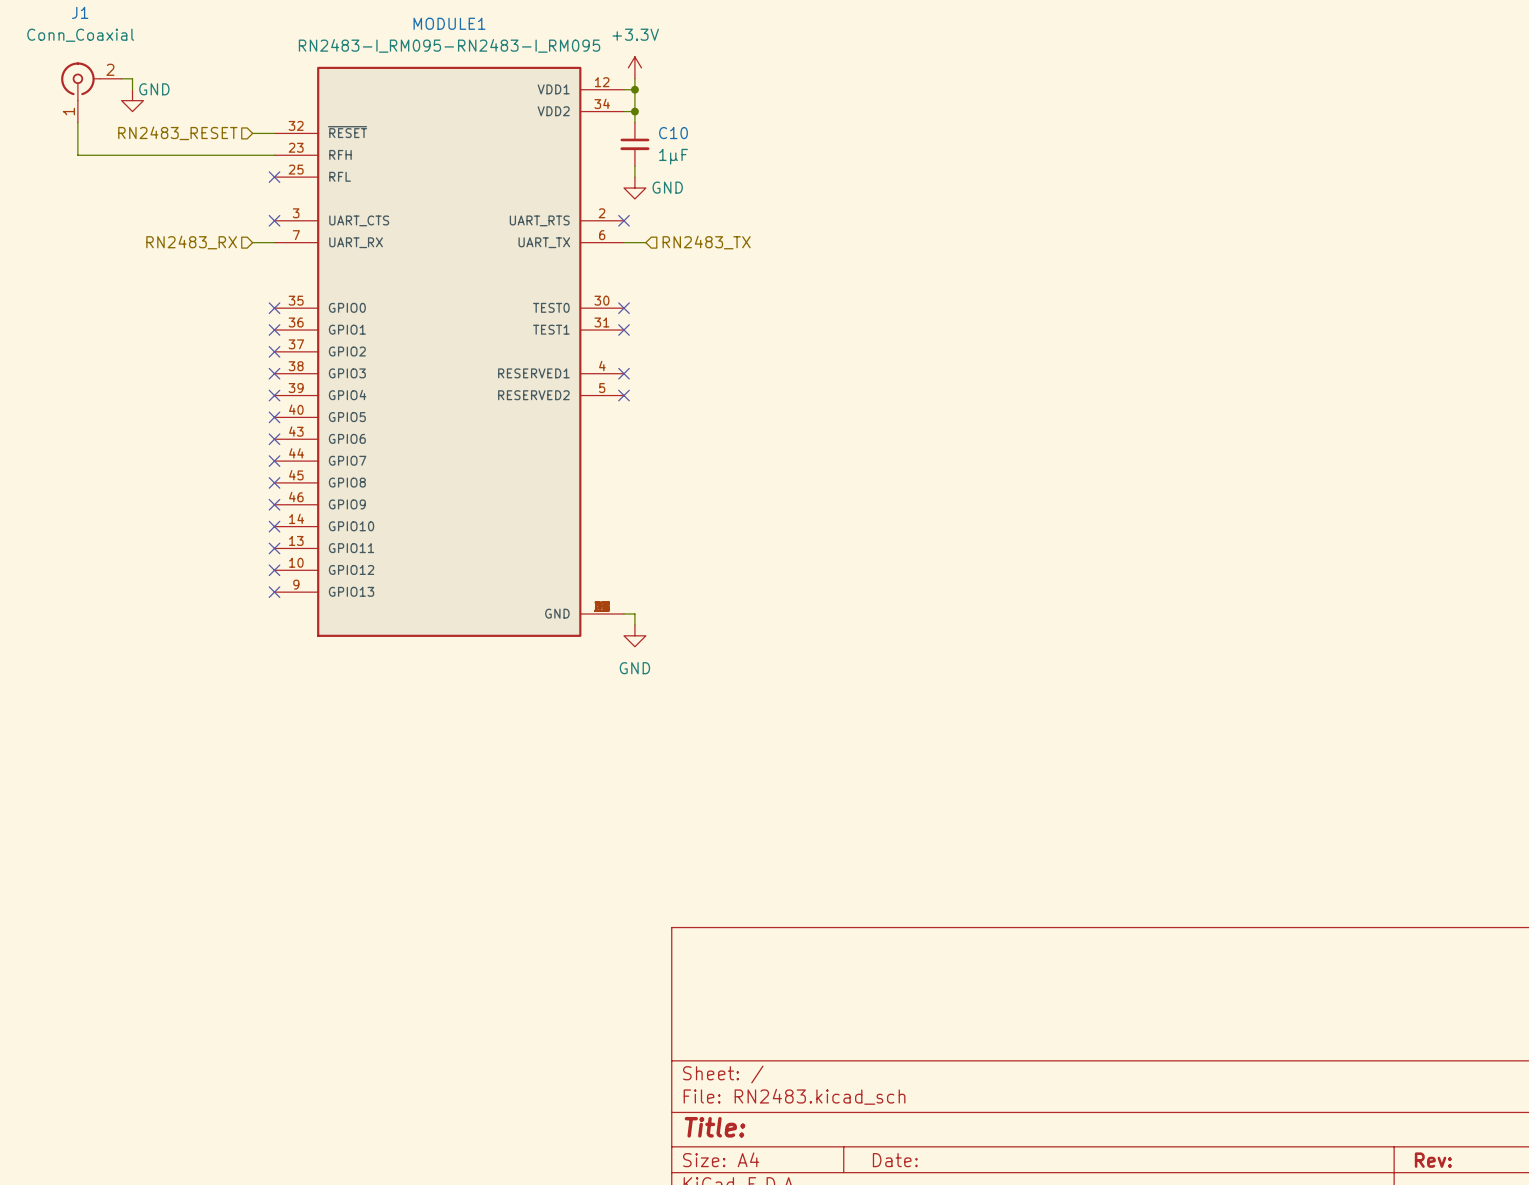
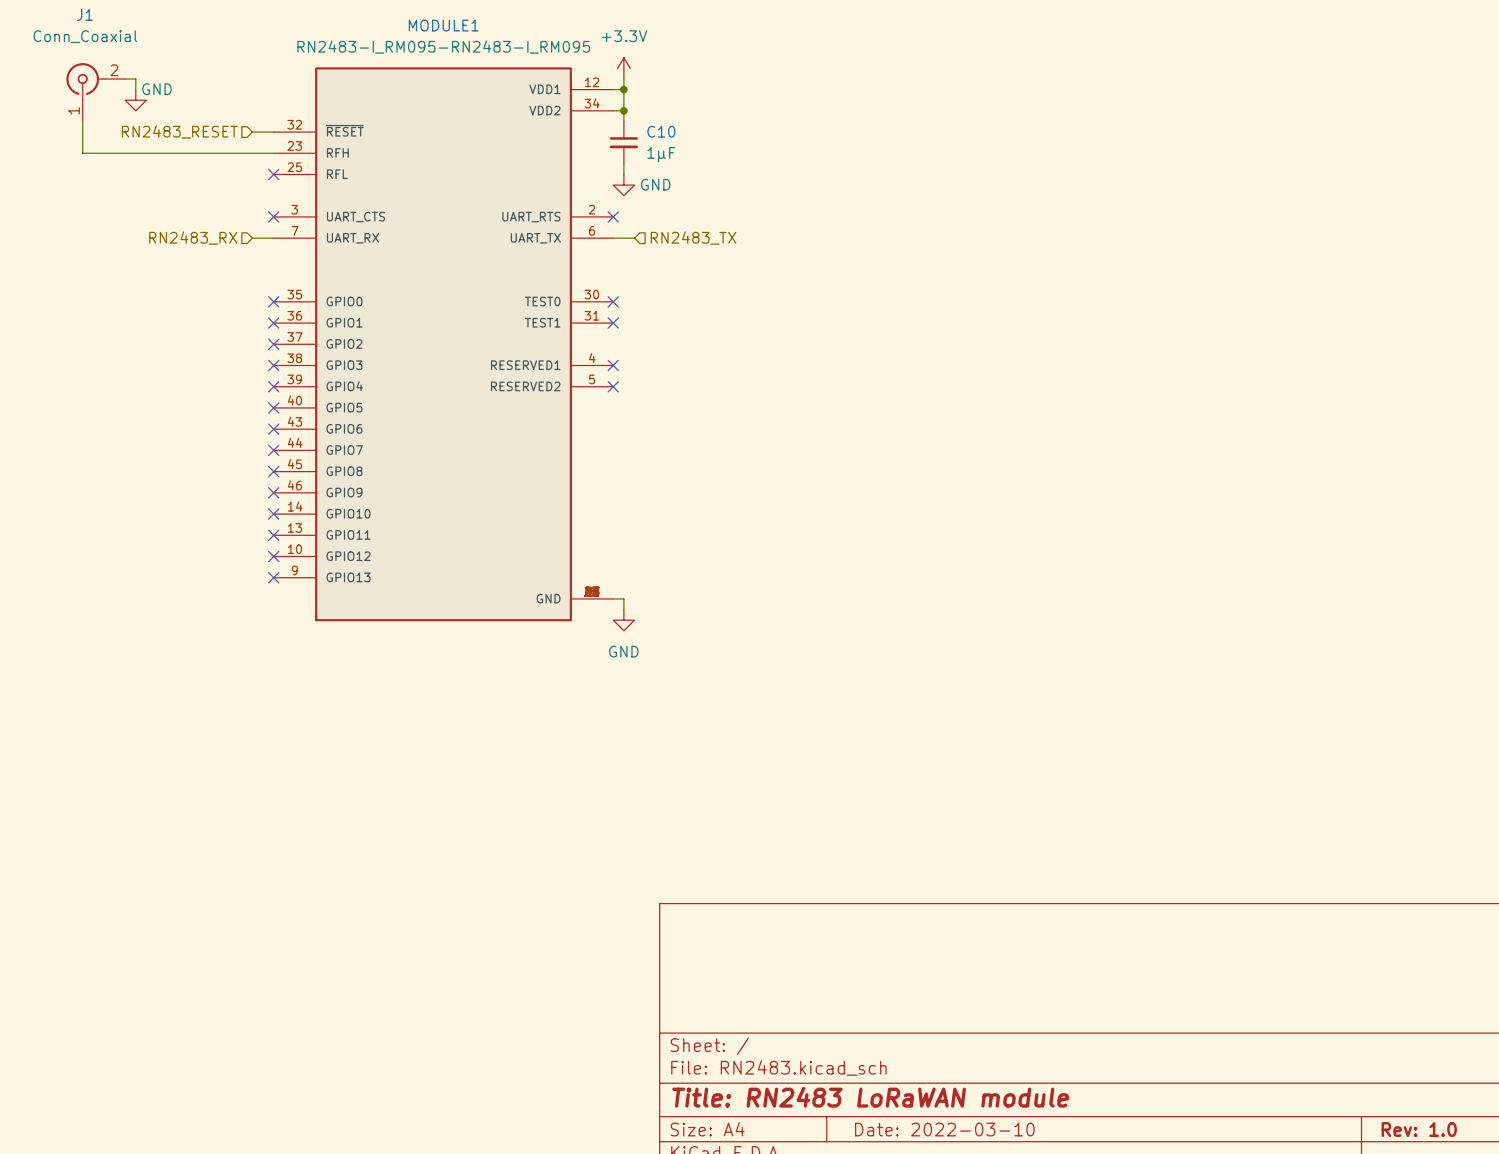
title block: Title: (715, 1127) -> Title: RN2483 LoRaWAN module (870, 1097)
title block: Date: (895, 1160) -> Date: 2022-03-10 (944, 1129)
title block: Rev: (1433, 1160) -> Rev: 1.0 (1419, 1129)

